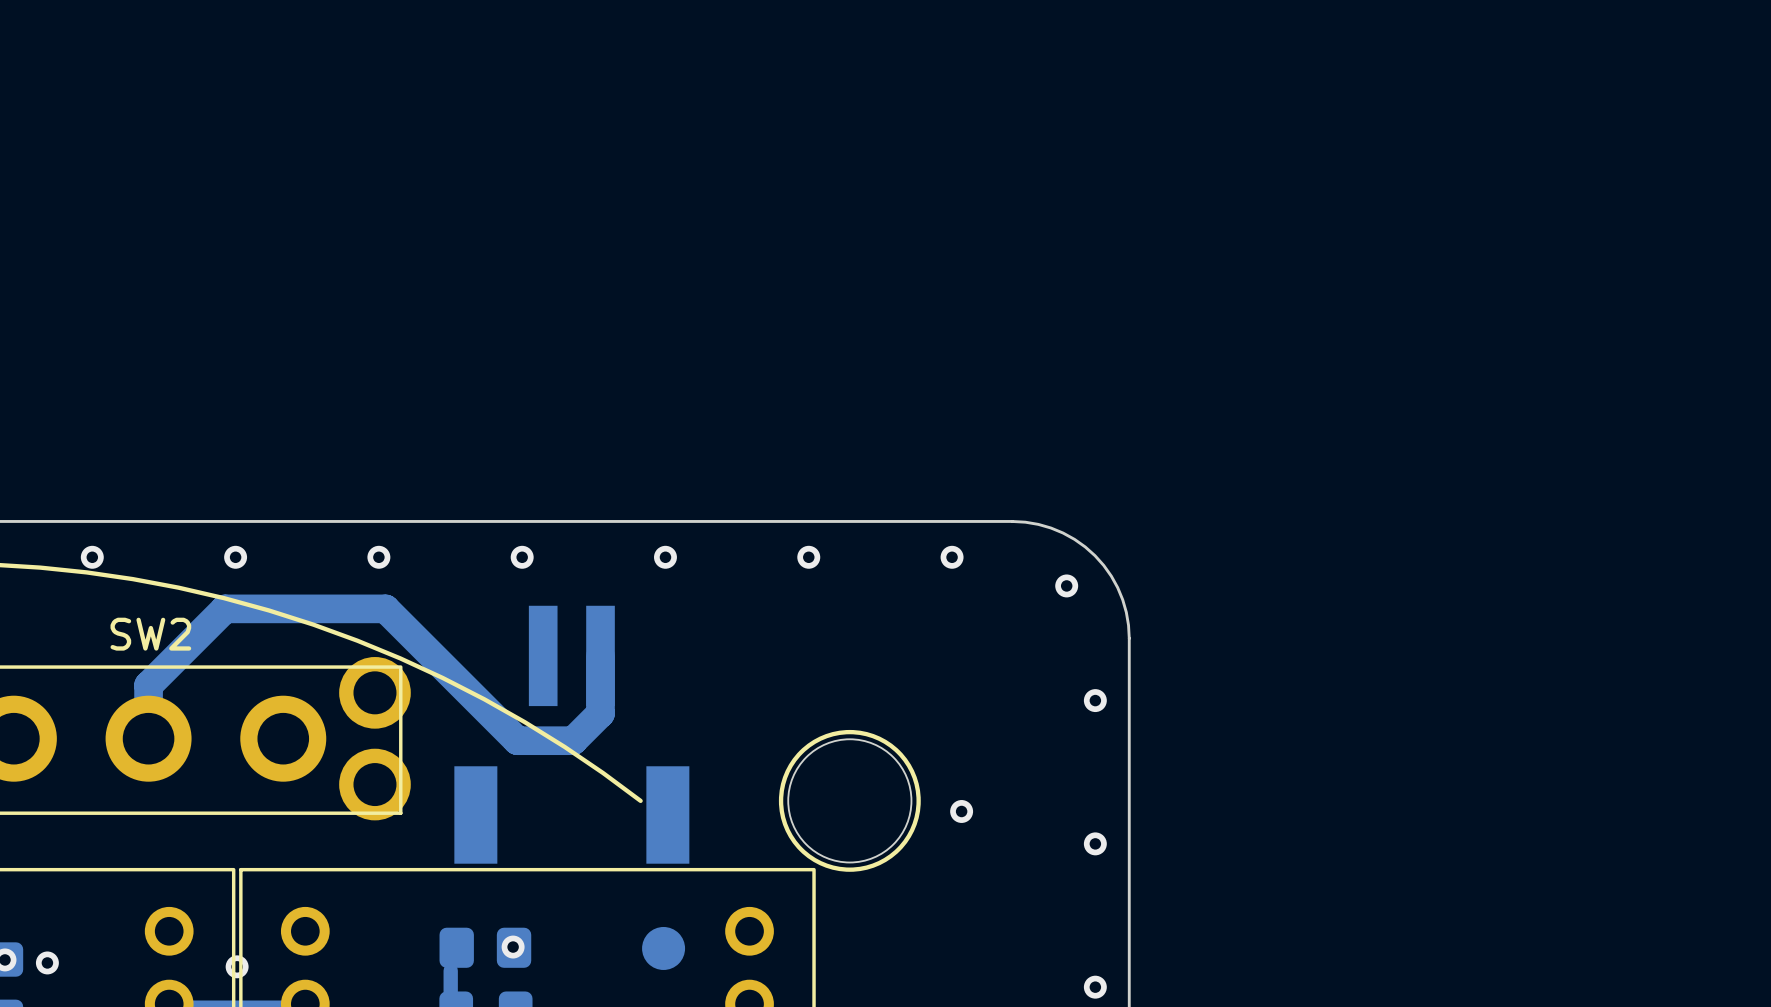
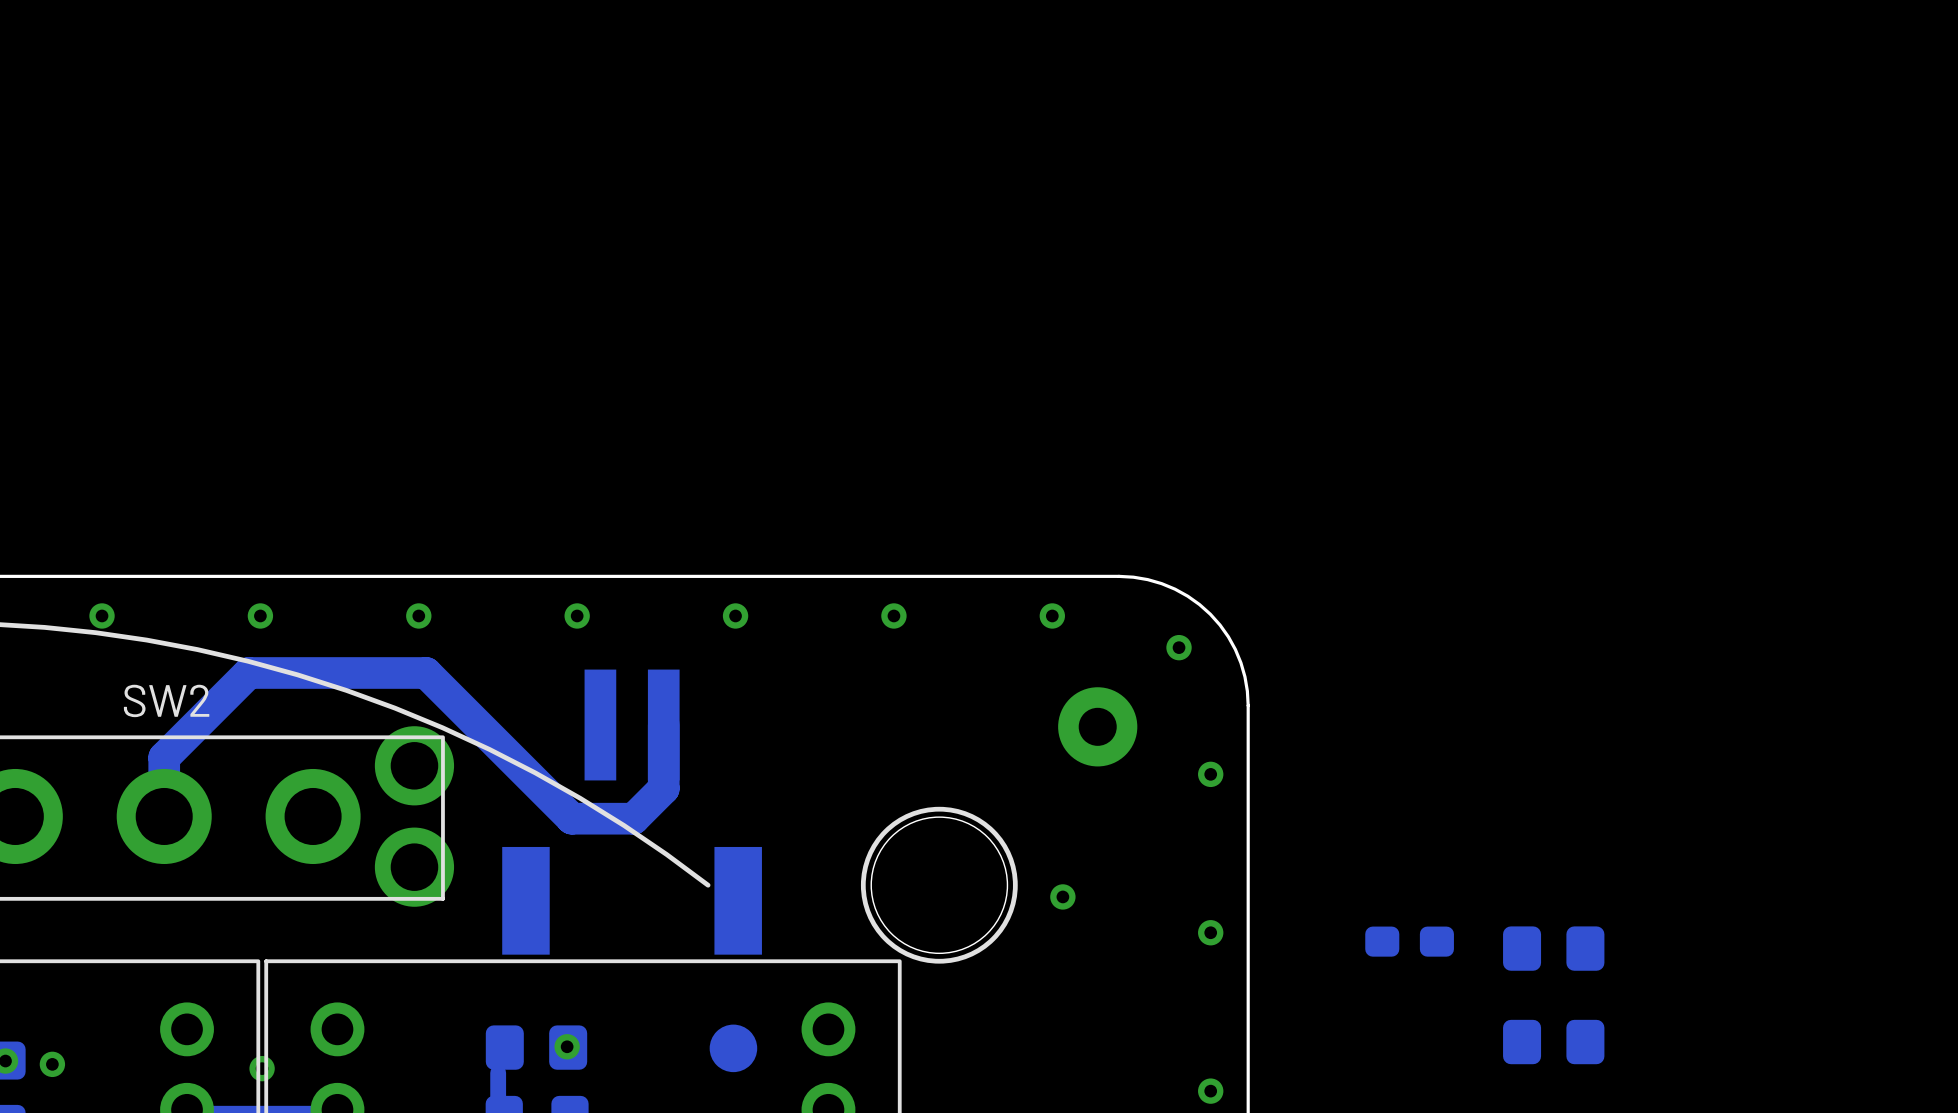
part: none -> (1097, 726)
part: none -> (1409, 941)
part: none -> (1553, 948)
part: none -> (1553, 1042)

